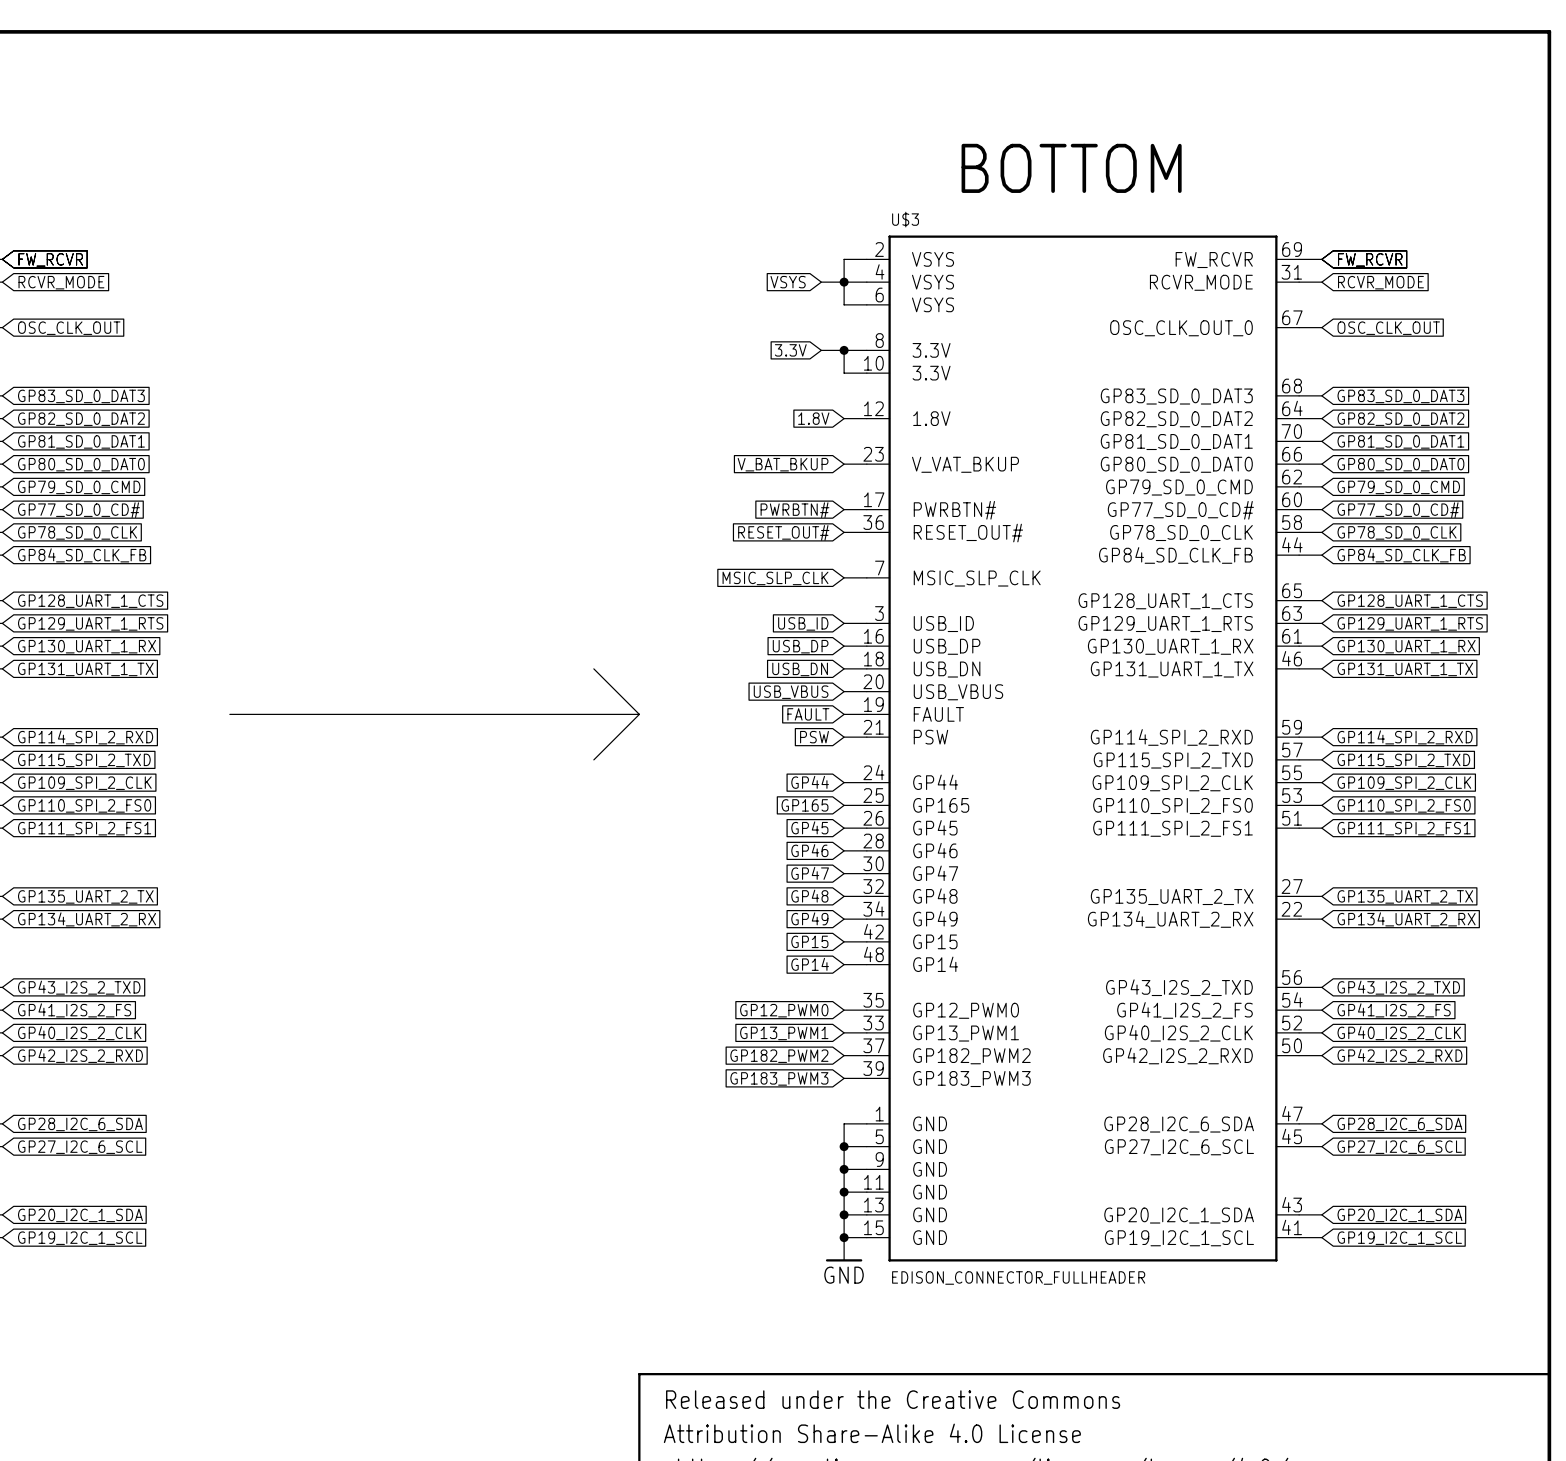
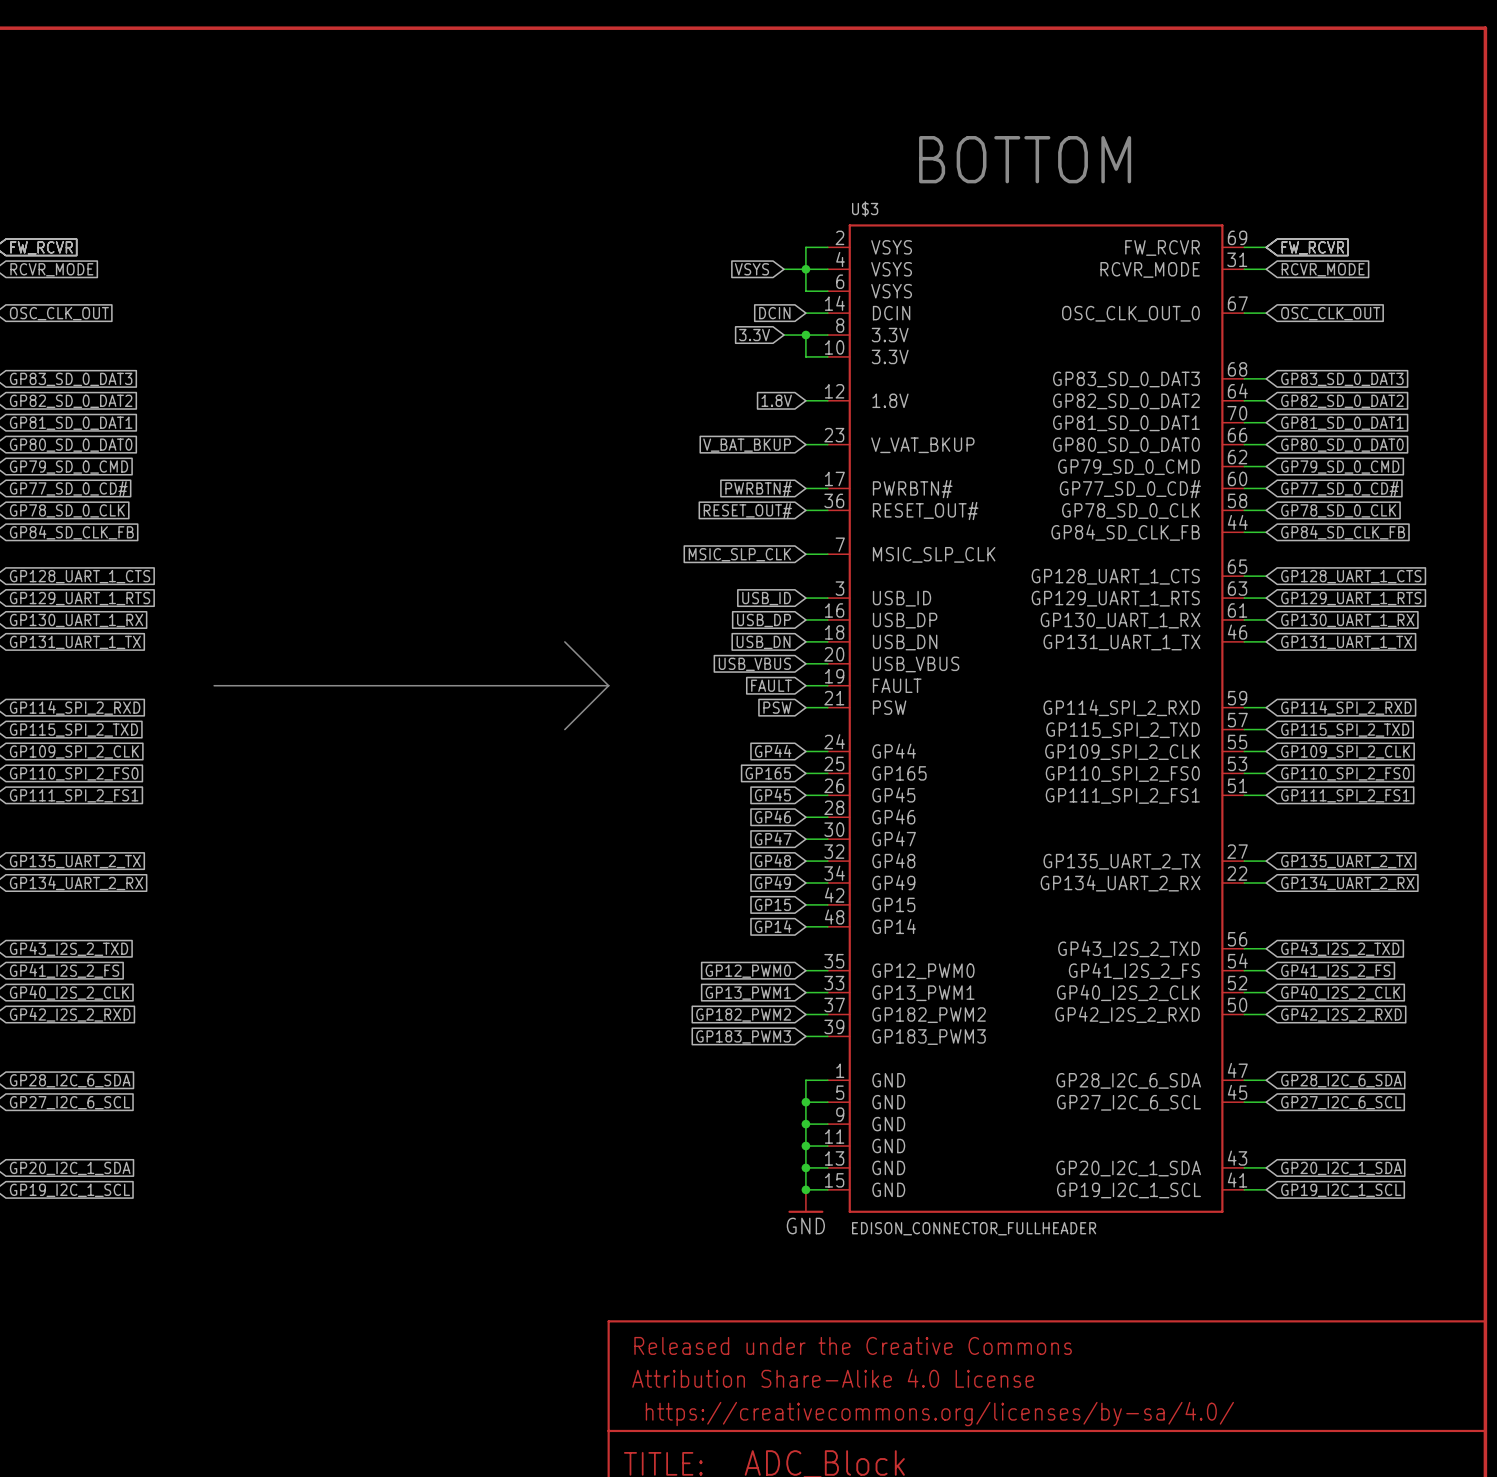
U$3 symbol: [866, 235, 1300, 1262] -> [827, 224, 1245, 1213]
global label: none -> DCIN (774, 313)
wire: none -> (805, 313) (827, 313)

